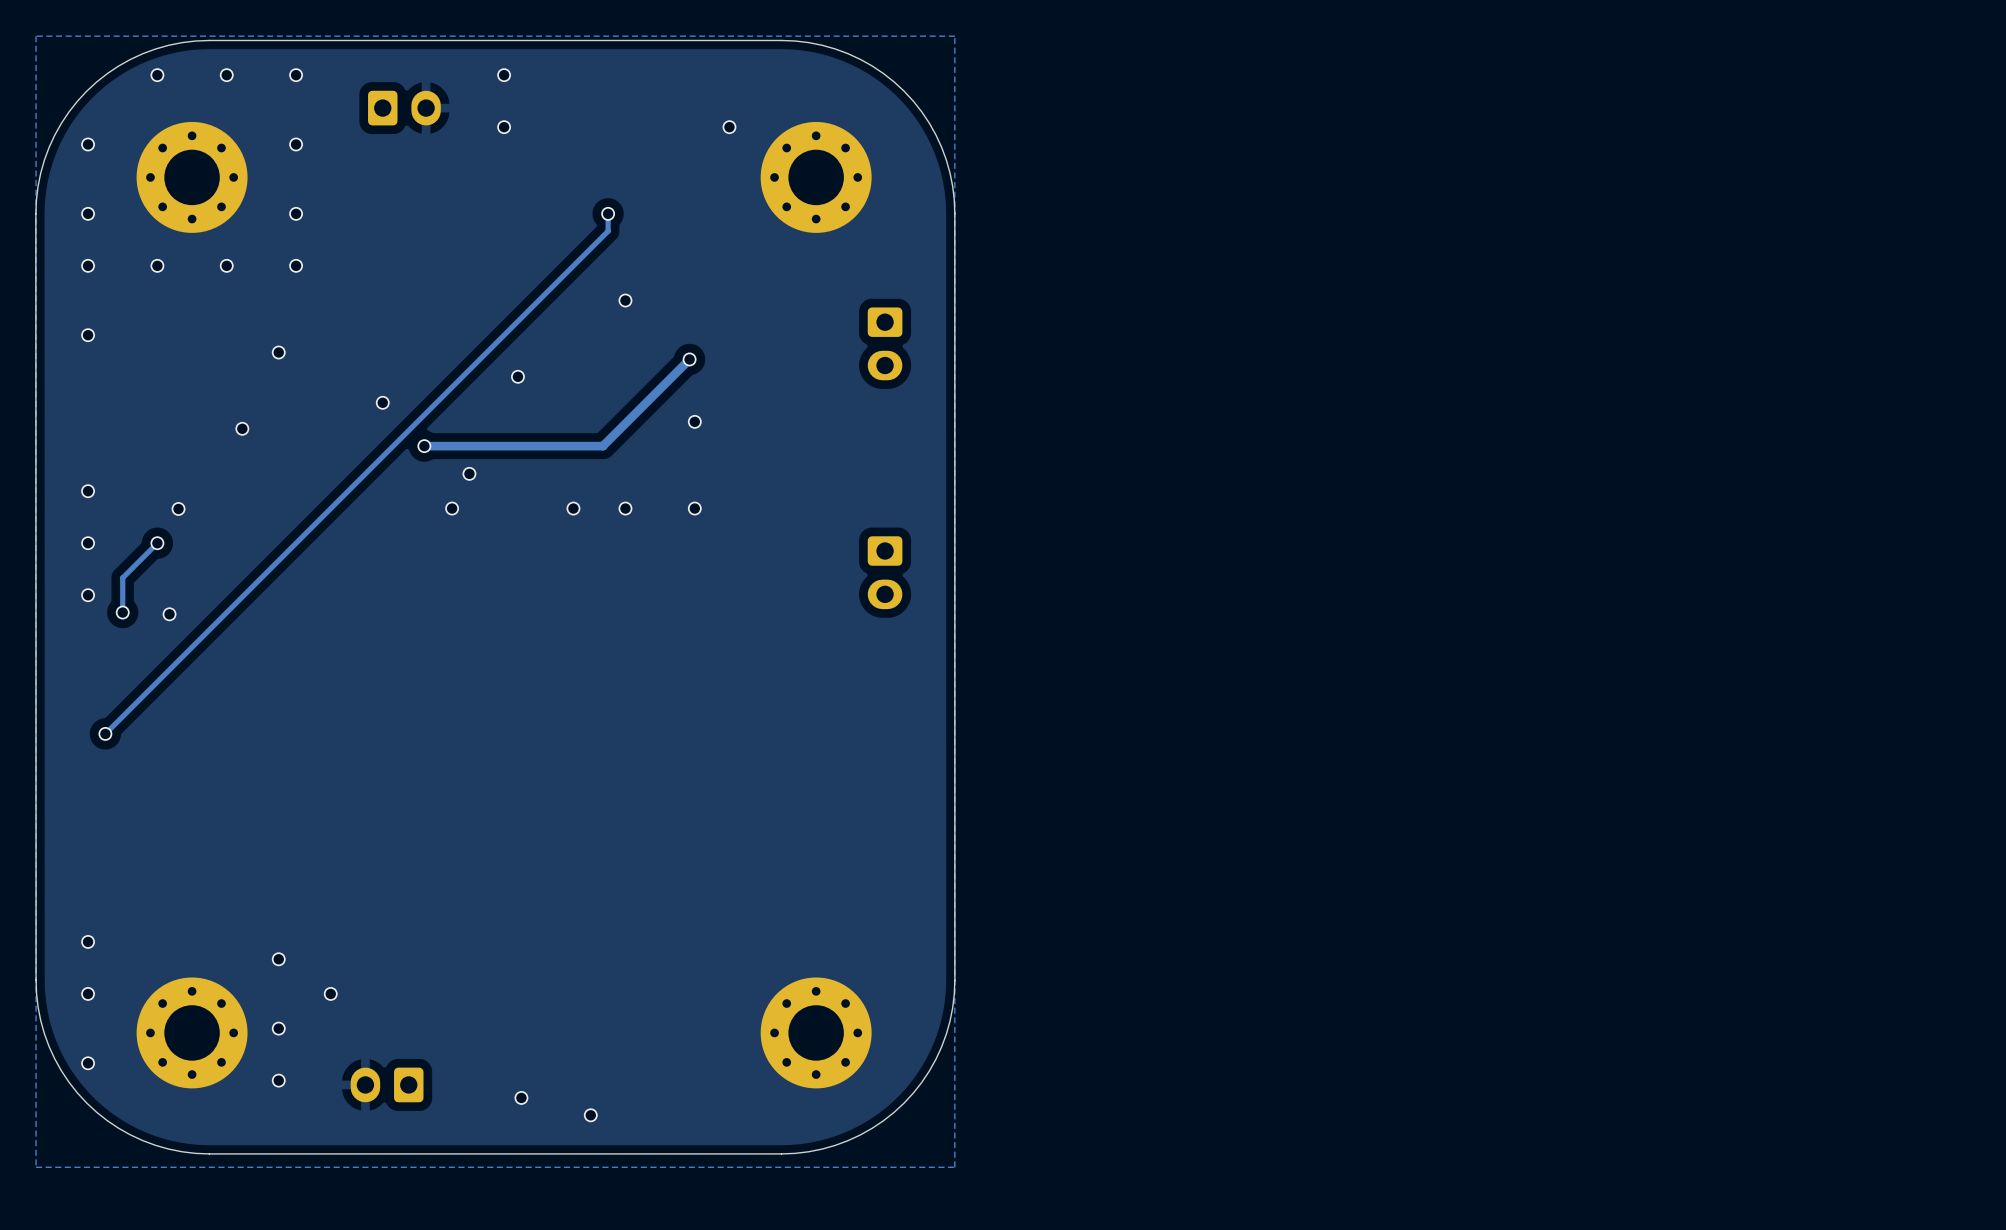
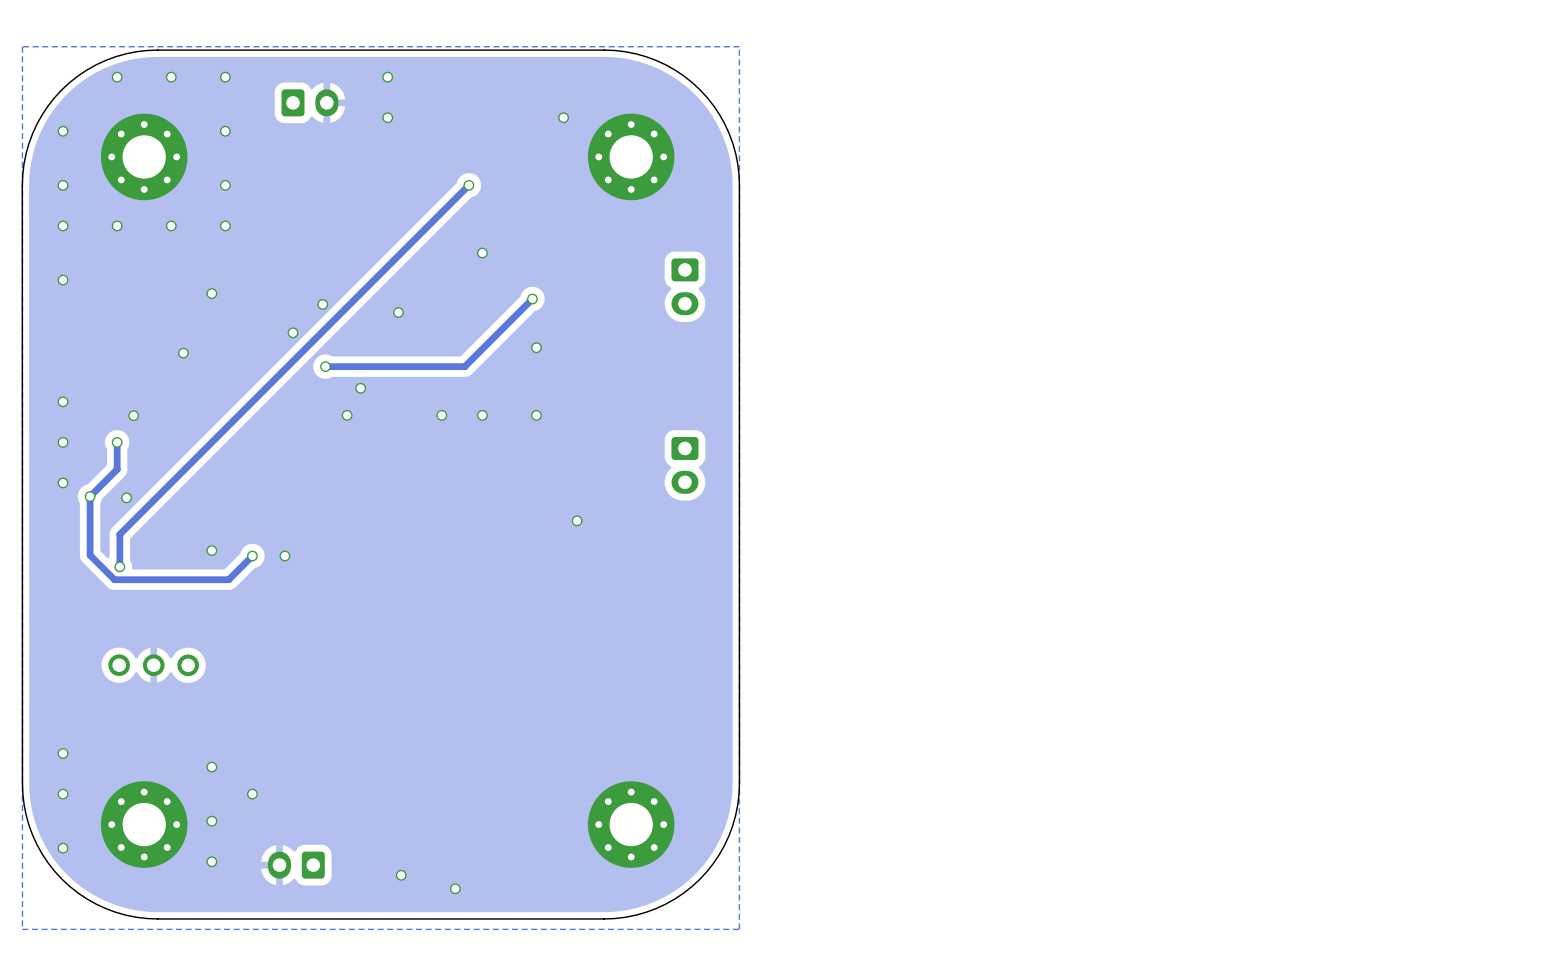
track: (608, 213) (608, 231) (105, 733) -> (468, 185) (119, 534) (119, 566)
via: none -> (322, 304)
track: (157, 543) (122, 577) (122, 612) -> (117, 442) (117, 469) (90, 496) (90, 555) (114, 579) (228, 579) (252, 556)
via: none -> (577, 520)
via: none -> (211, 550)
via: none -> (252, 556)
via: none -> (284, 556)
via position: (105, 733) -> (119, 566)
part: none -> (153, 665)

